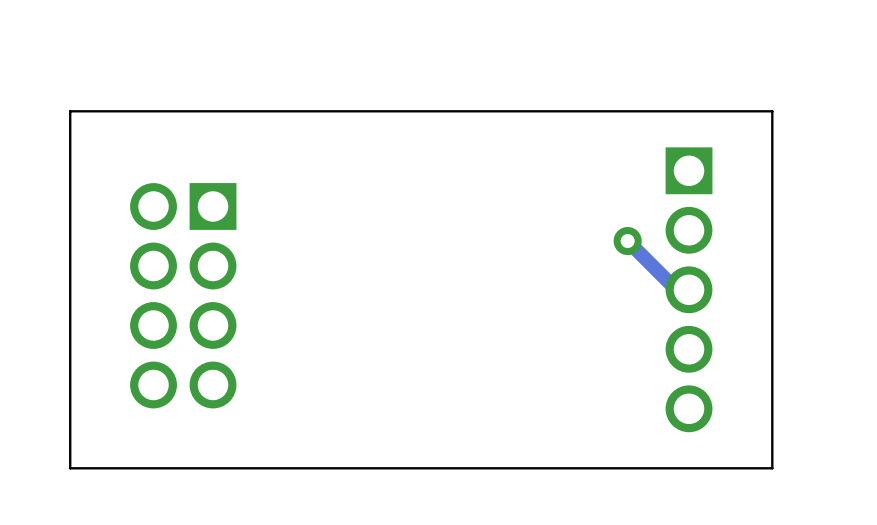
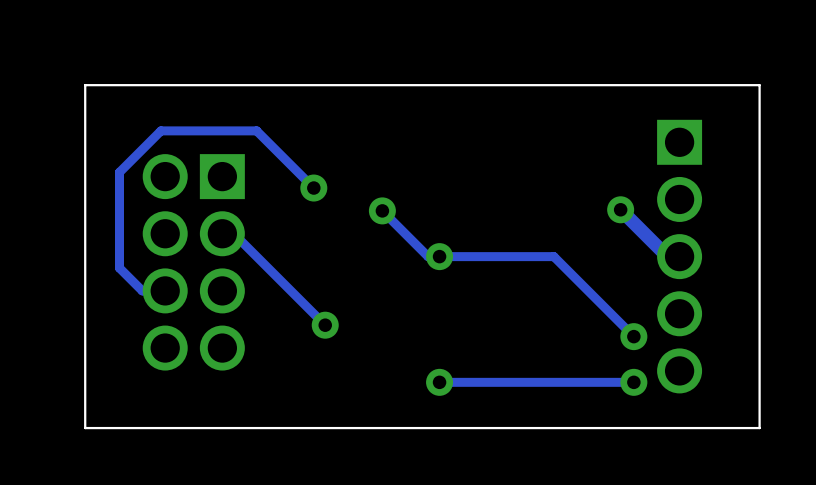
track: none -> (313, 188) (256, 130) (160, 130) (119, 172) (119, 268) (142, 290) (165, 290)
via: none -> (313, 188)
track: none -> (382, 210) (428, 256) (553, 256) (633, 336)
via: none -> (382, 210)
track: none -> (222, 233) (233, 233) (325, 325)
via: none -> (439, 256)
via: none -> (325, 325)
via: none -> (633, 336)
via: none -> (439, 382)
track: none -> (633, 382) (439, 382)
via: none -> (633, 382)

